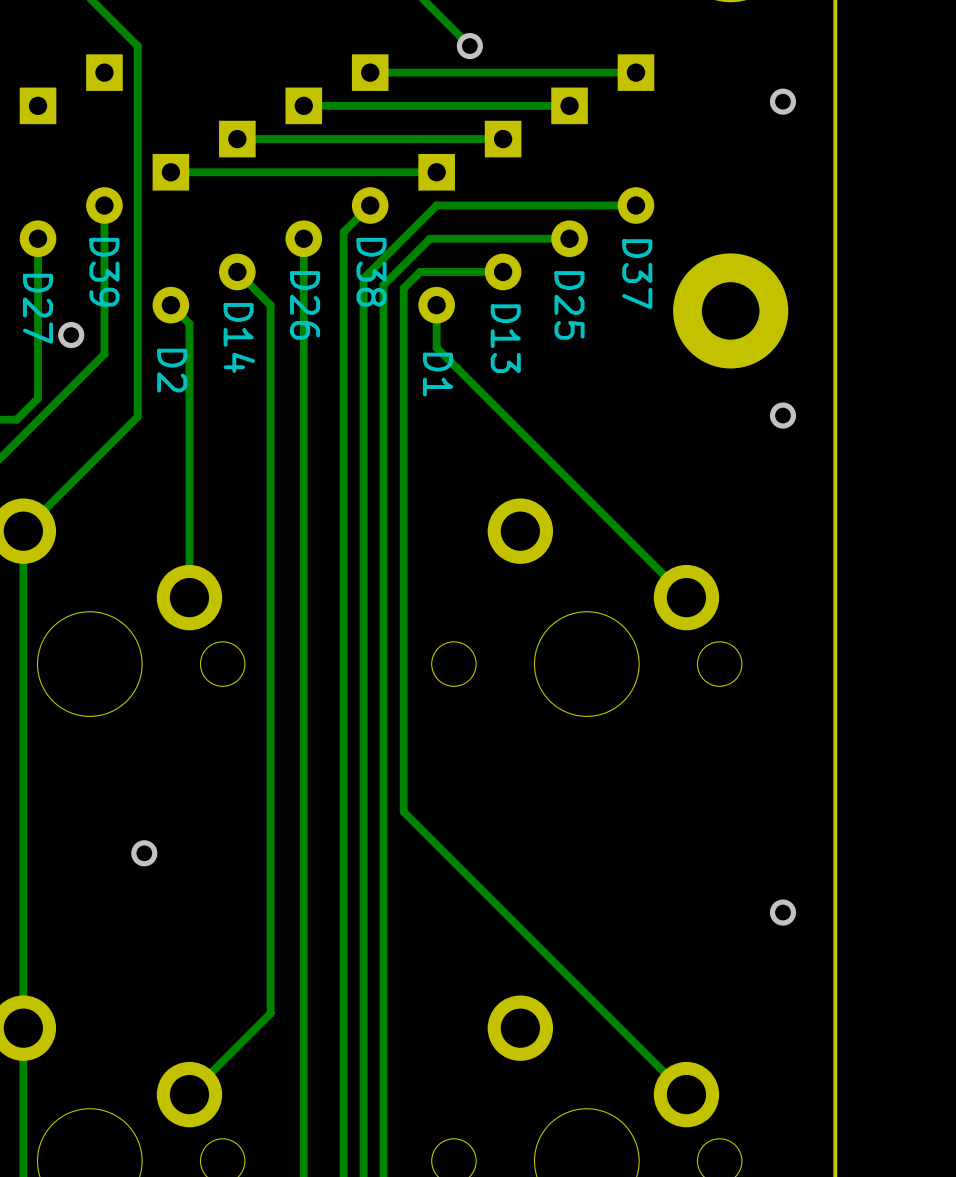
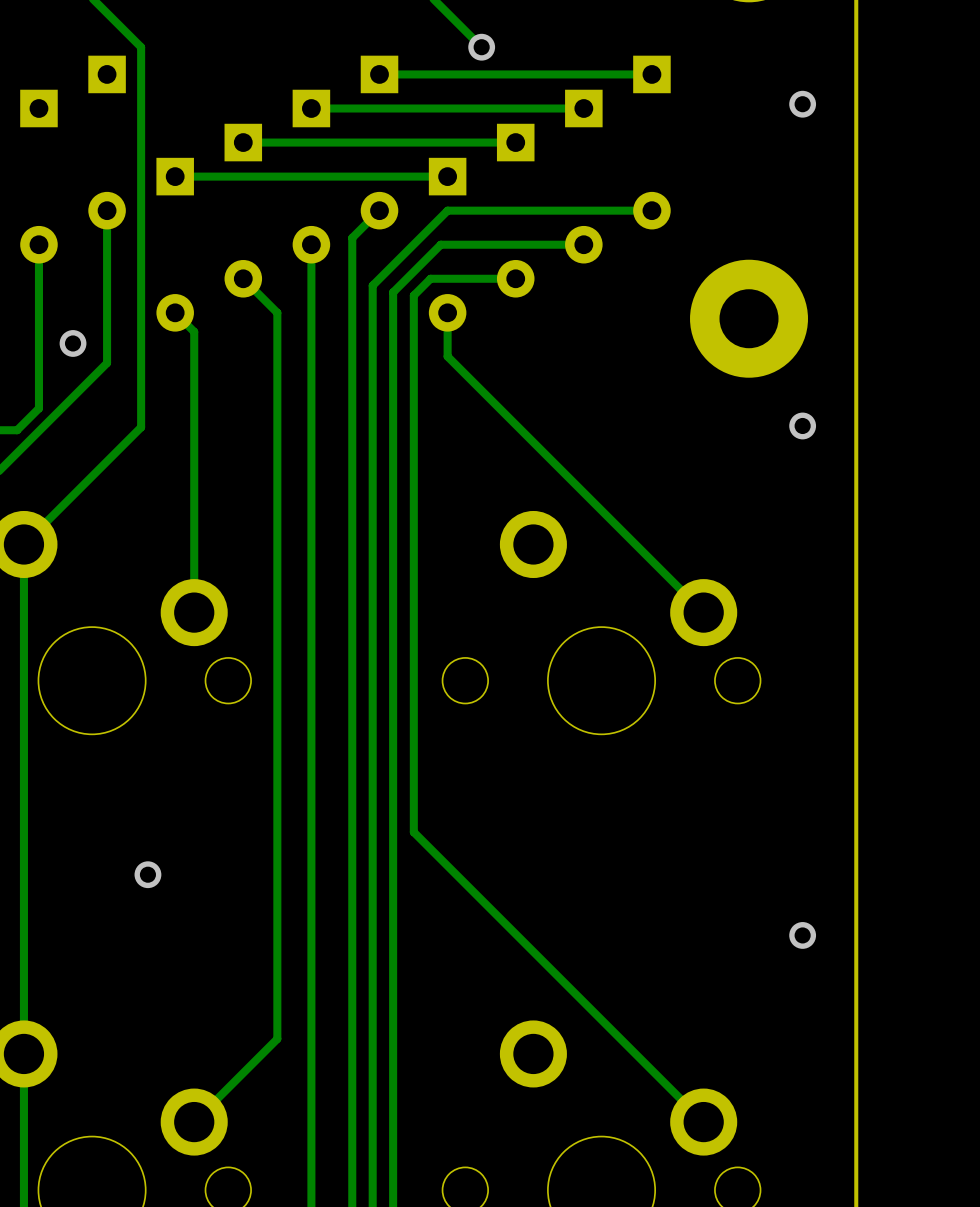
text: D39 (104, 272) -> none
text: D38 (371, 272) -> none
text: D37 (637, 274) -> none
text: D26 (305, 305) -> none
text: D25 (569, 305) -> none
text: D27 (38, 308) -> none
text: D14 (239, 337) -> none
text: D13 (505, 338) -> none
text: D2 (172, 370) -> none
text: D1 (437, 374) -> none

